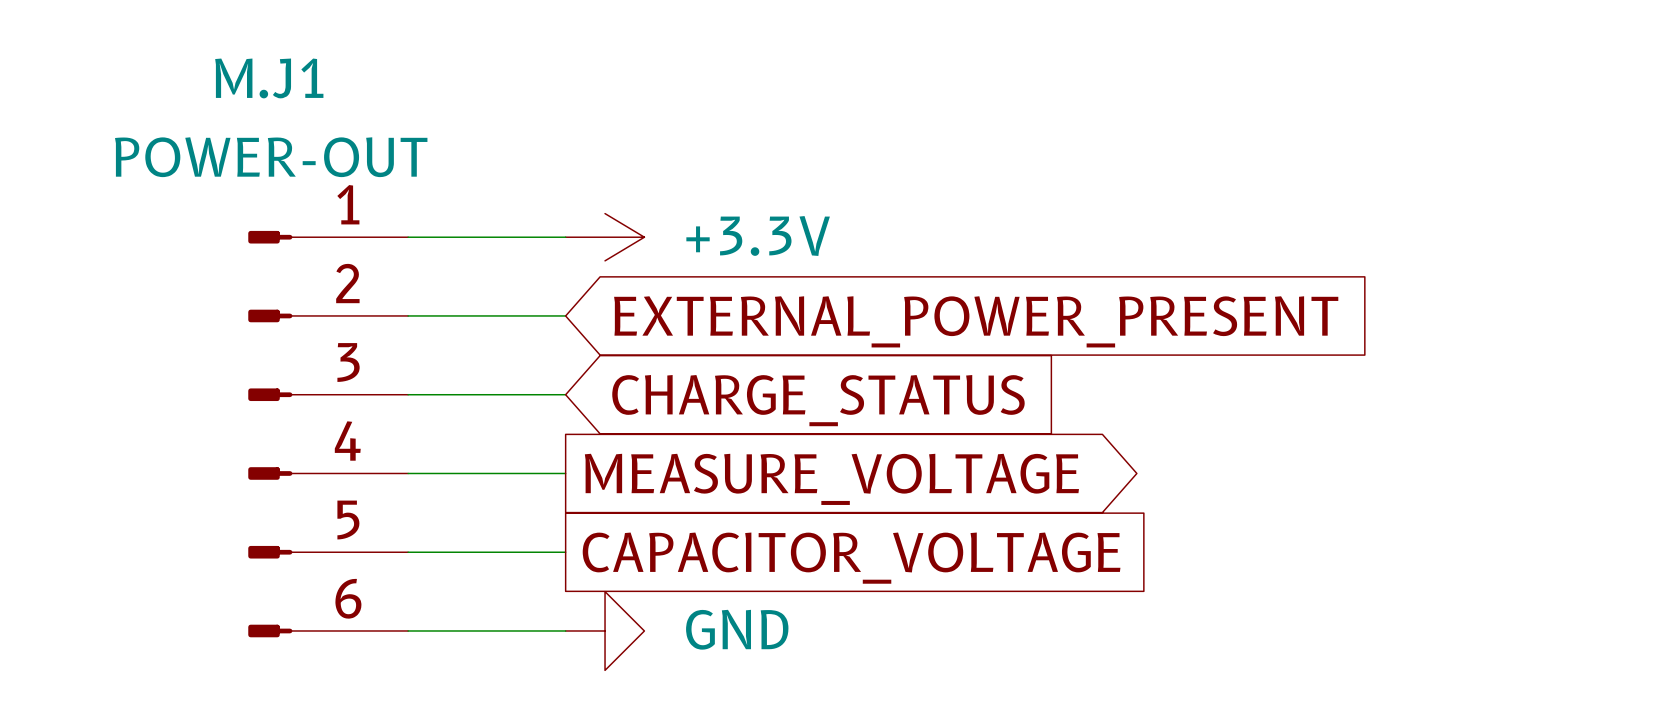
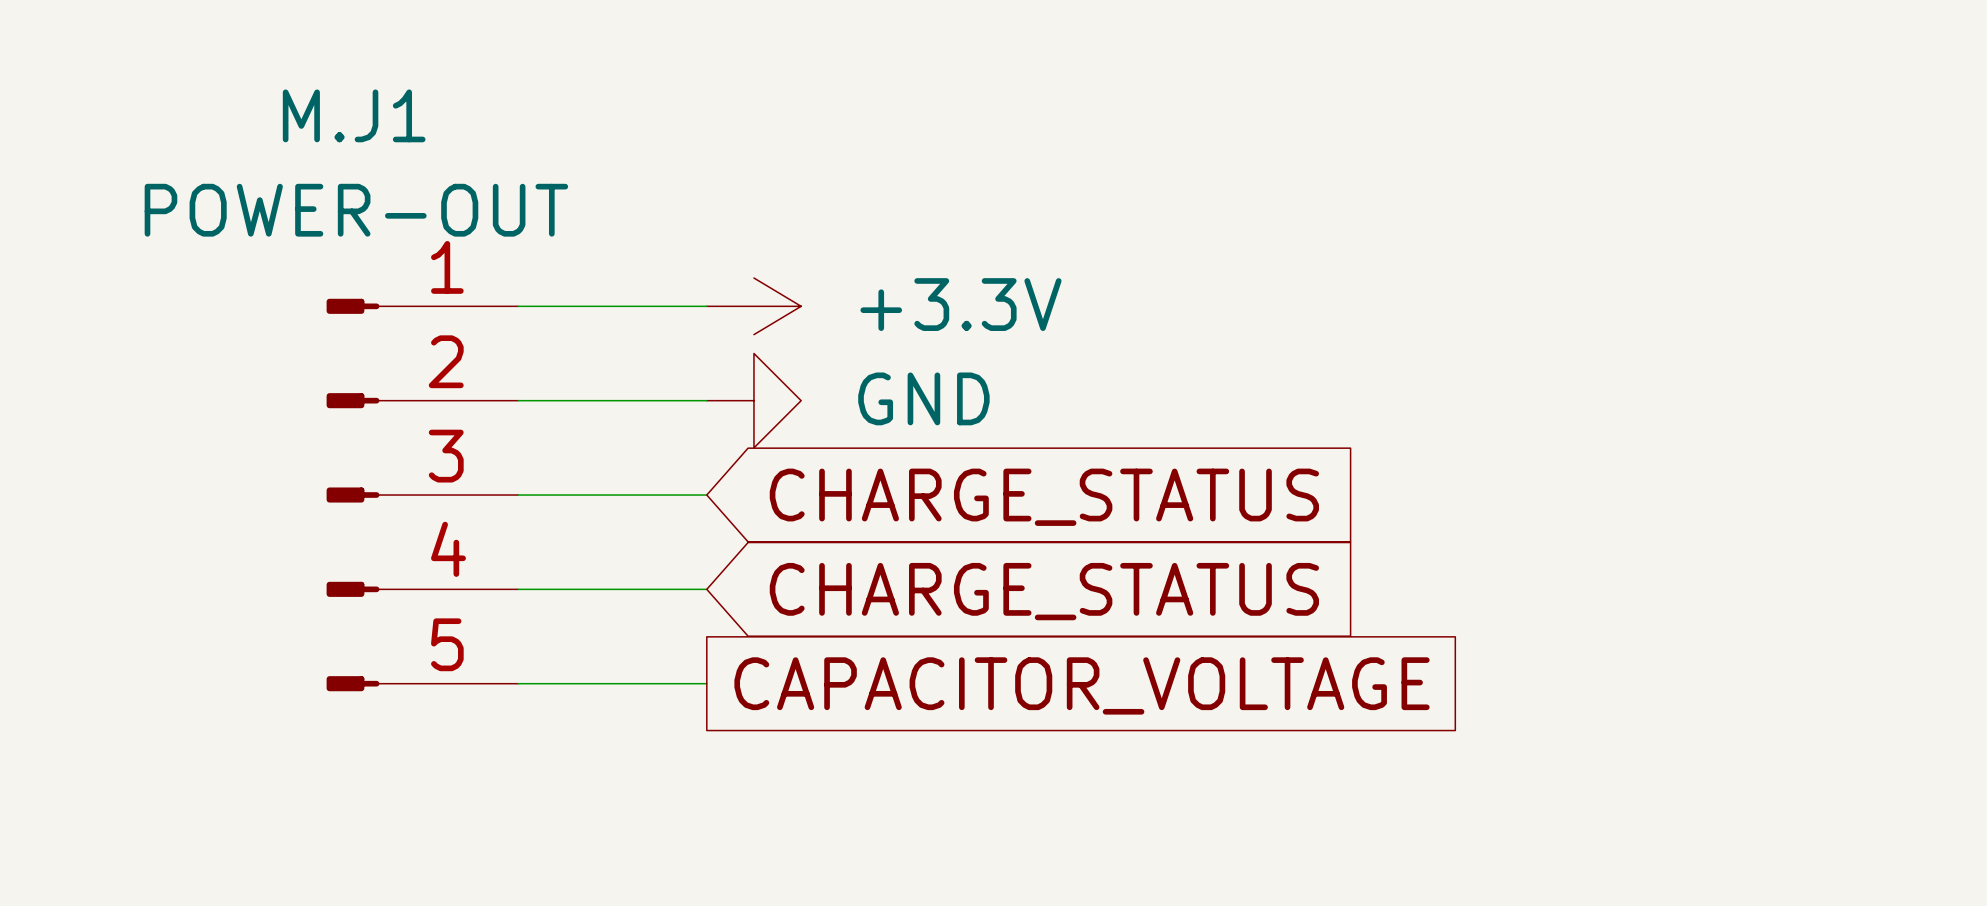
M.J1 symbol: [248, 230, 409, 638] -> [326, 298, 519, 692]
global label: EXTERNAL_POWER_PRESENT (976, 321) -> none
global label shape: output (831, 479) -> input (1044, 591)
global label: MEASURE_VOLTAGE (831, 479) -> CHARGE_STATUS (1044, 591)
wire: (408, 630) (565, 630) -> none
power symbol position: GND (605, 630) -> GND (753, 400)

